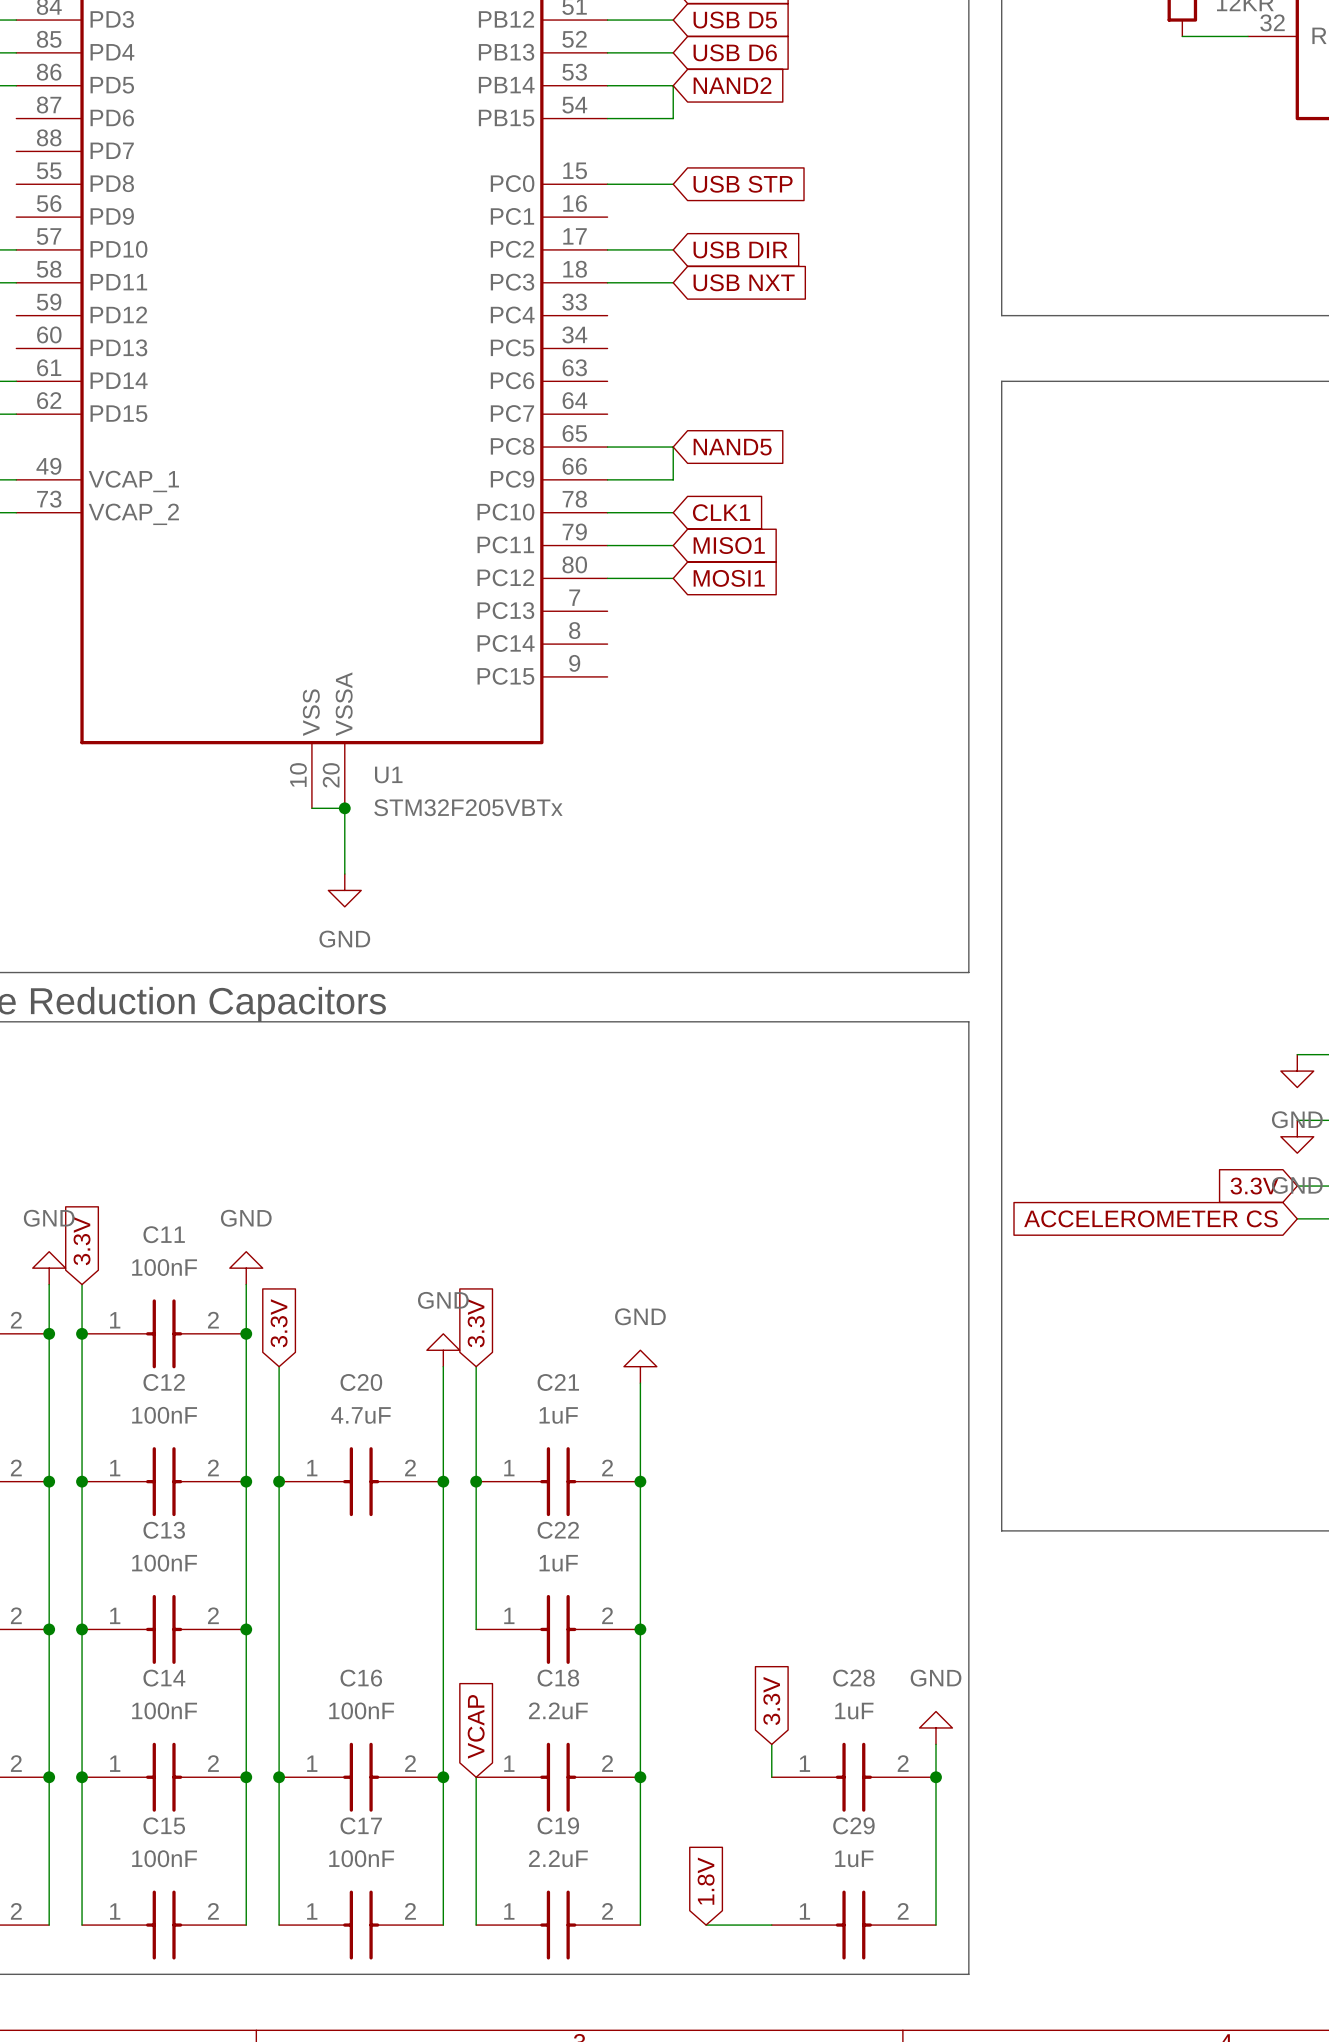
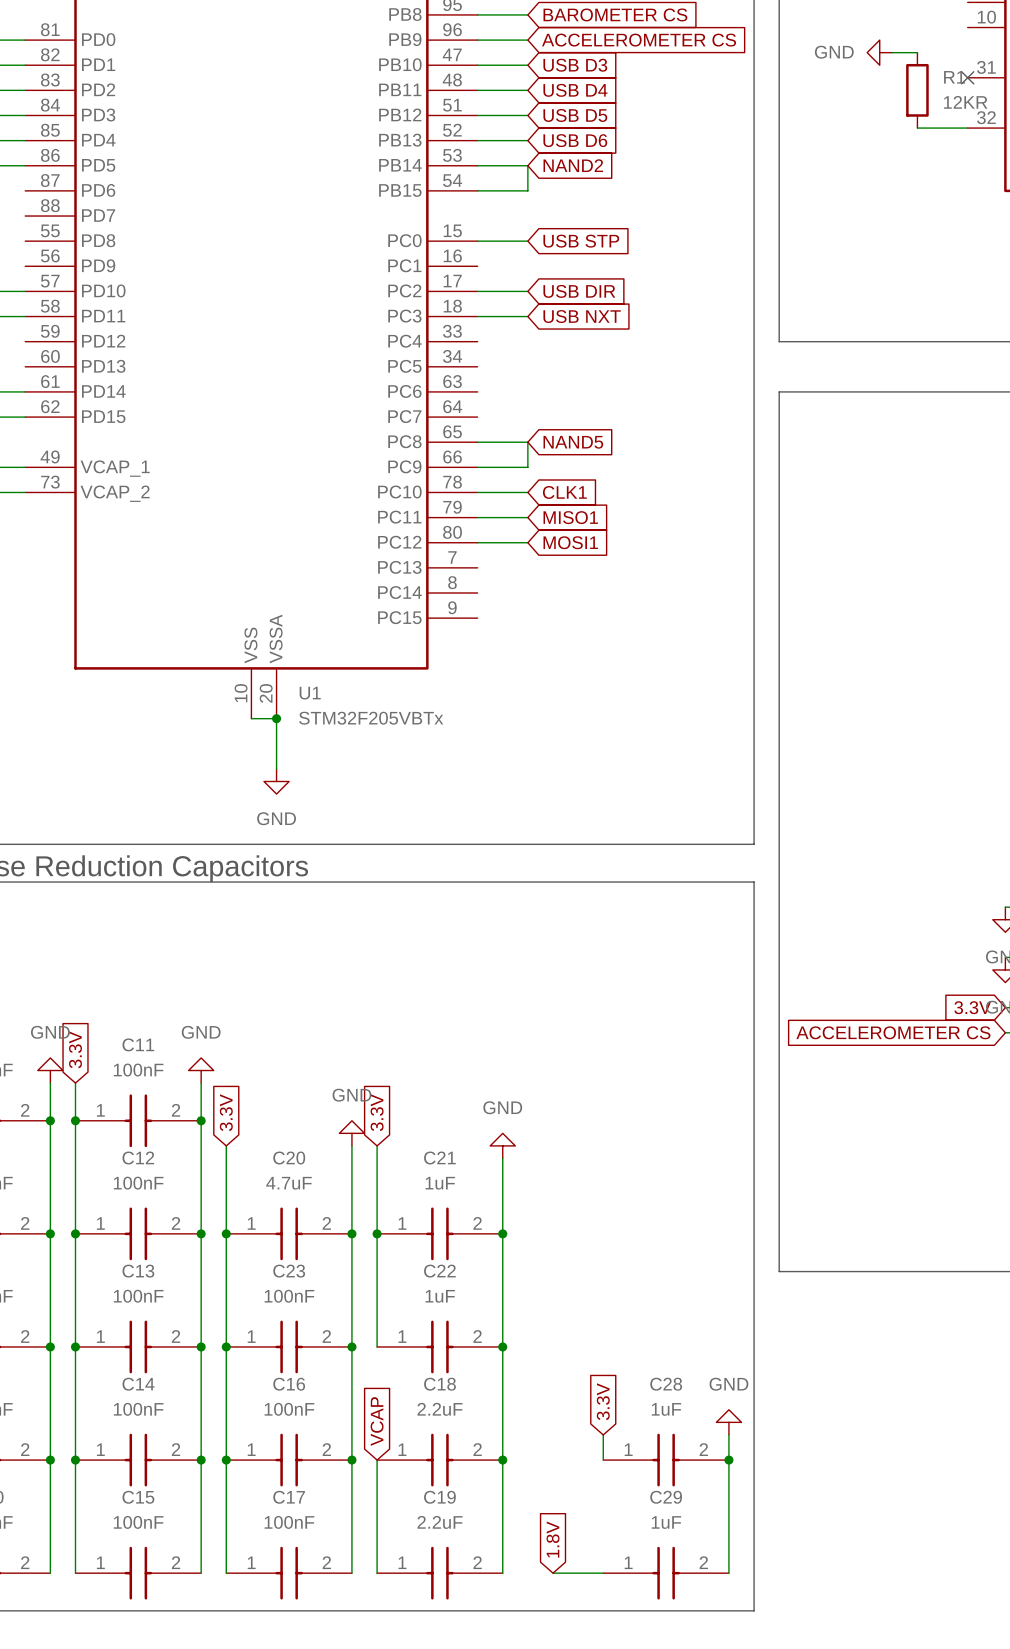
junction: none -> (226, 1346)
C23: none -> 100nF (289, 1346)
junction: none -> (351, 1346)

